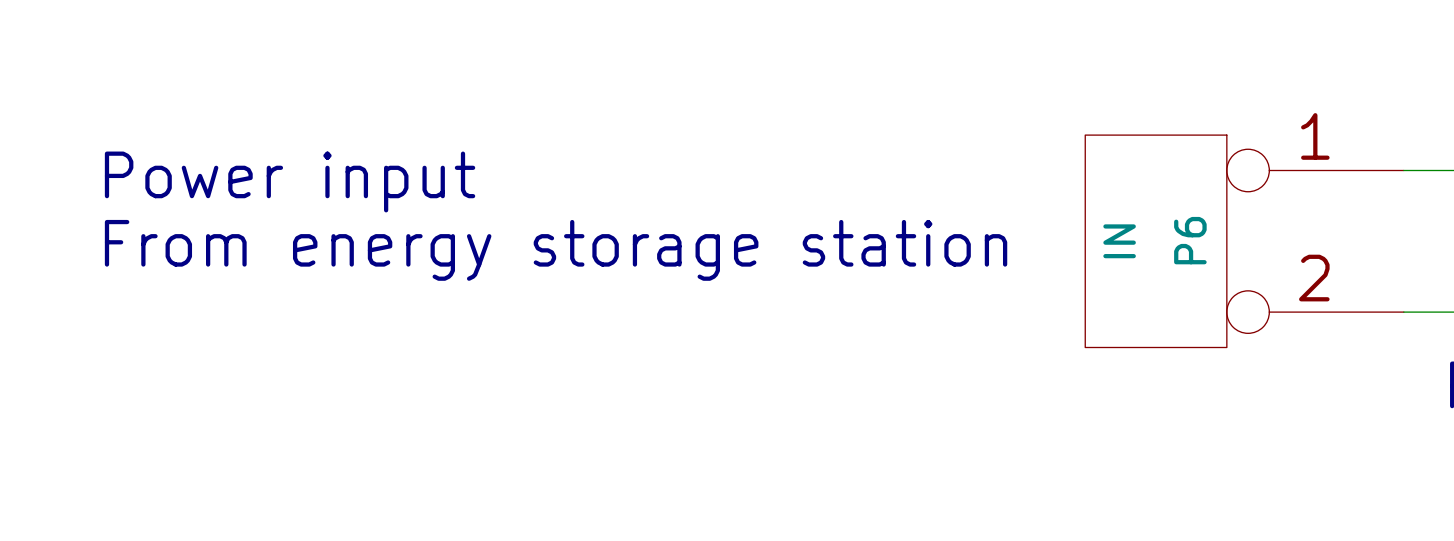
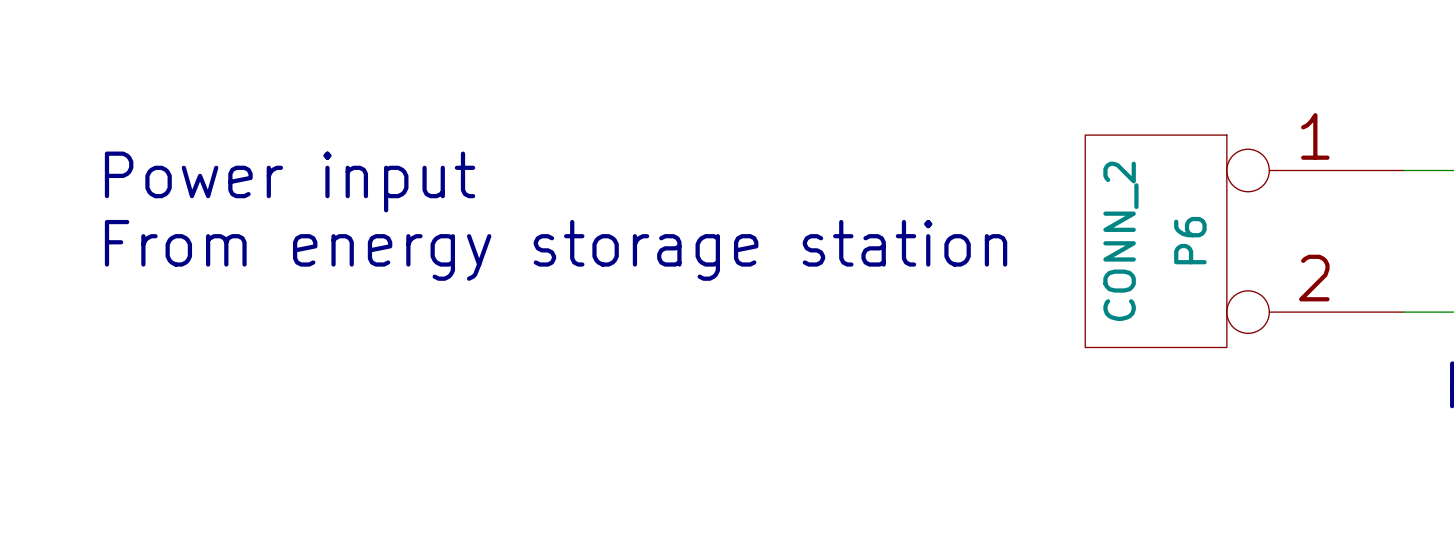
P6 value: IN (1119, 241) -> CONN_2 (1120, 241)

